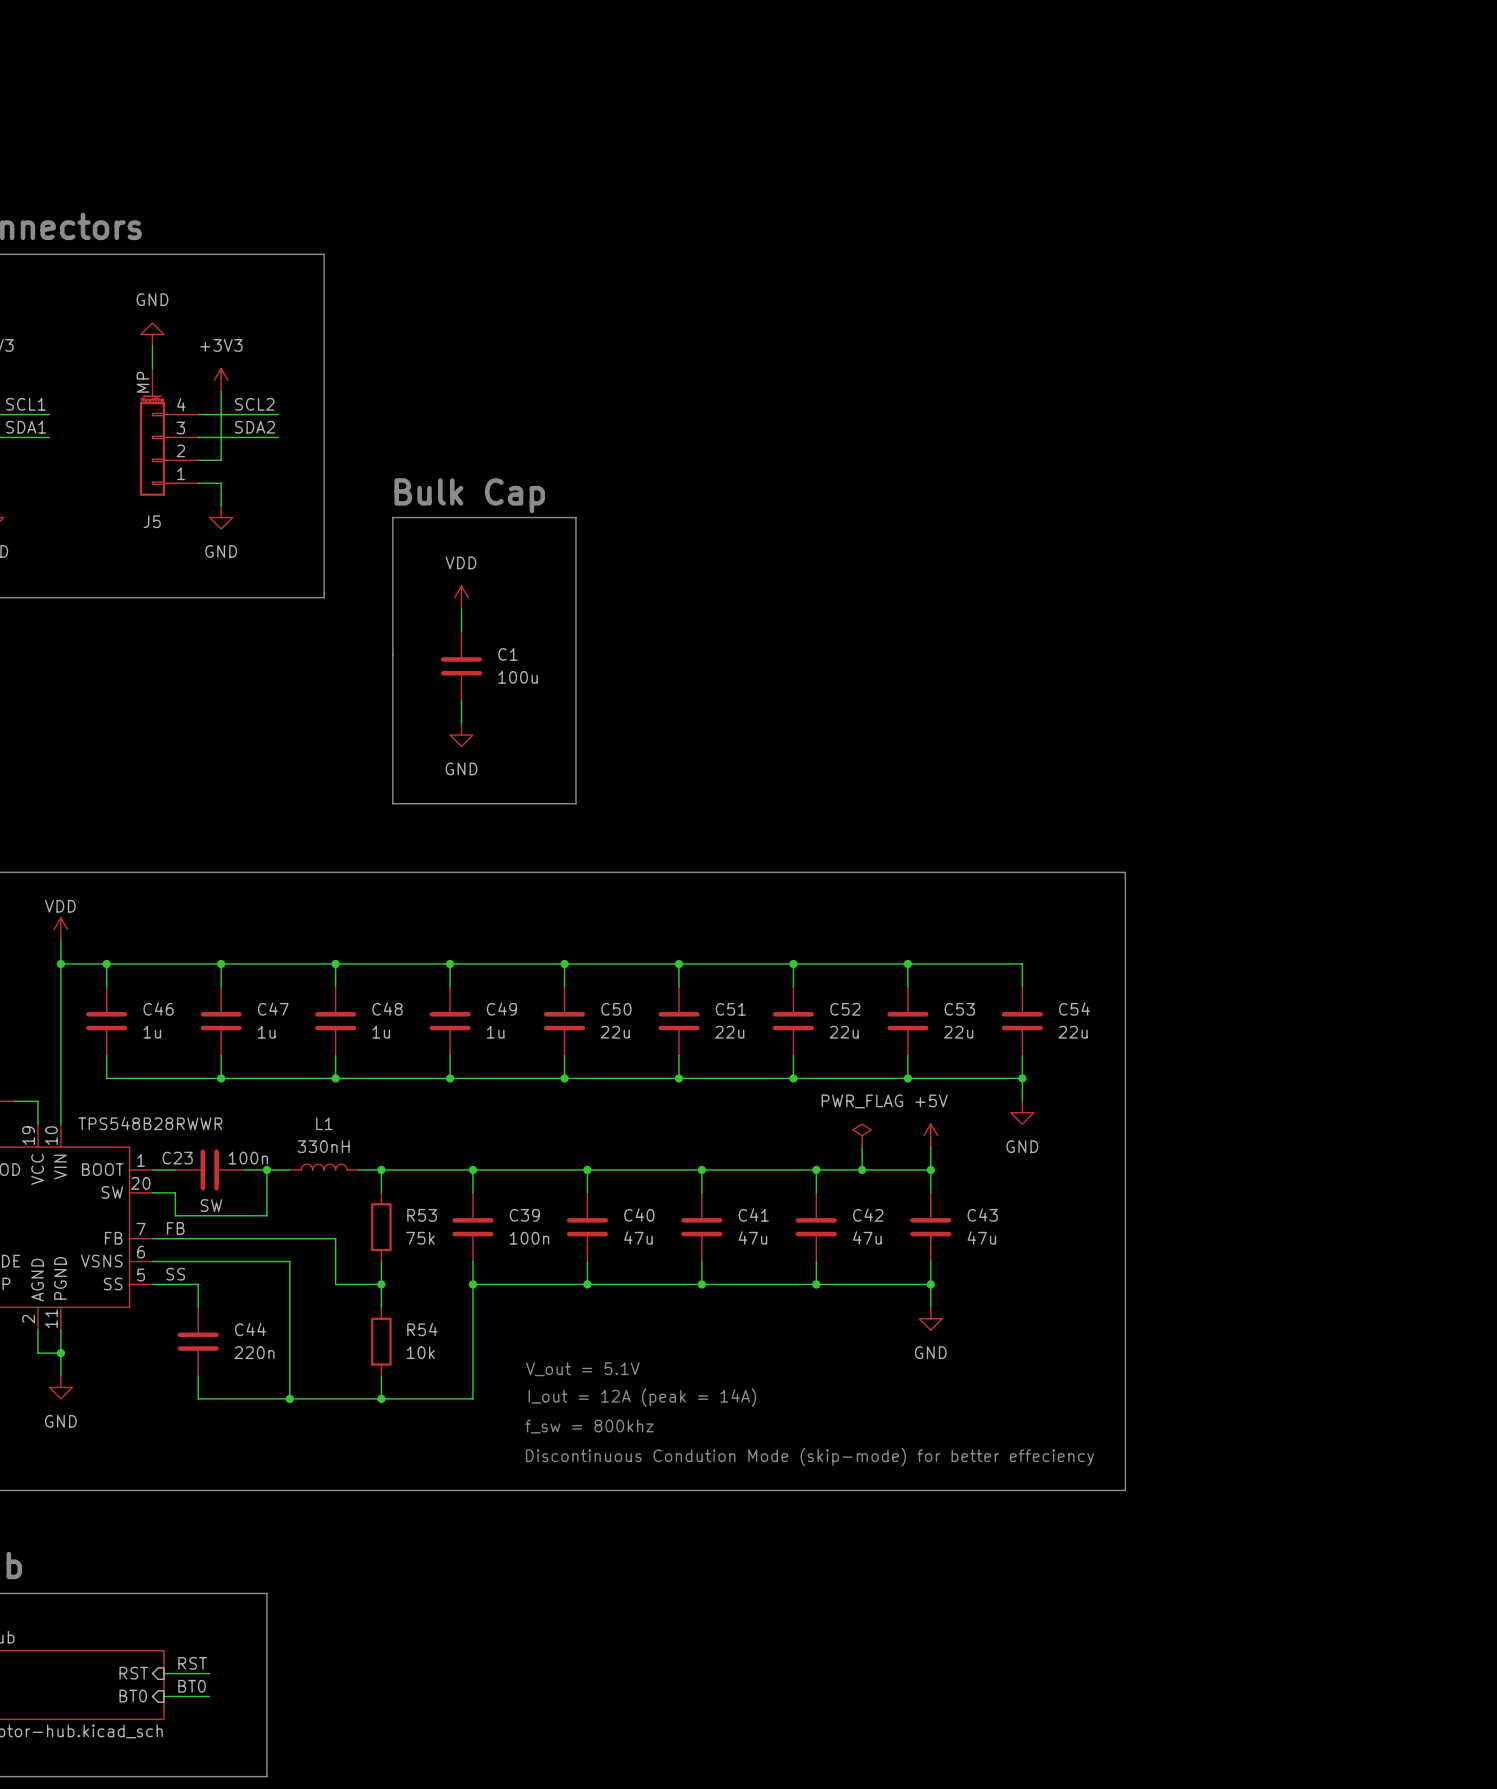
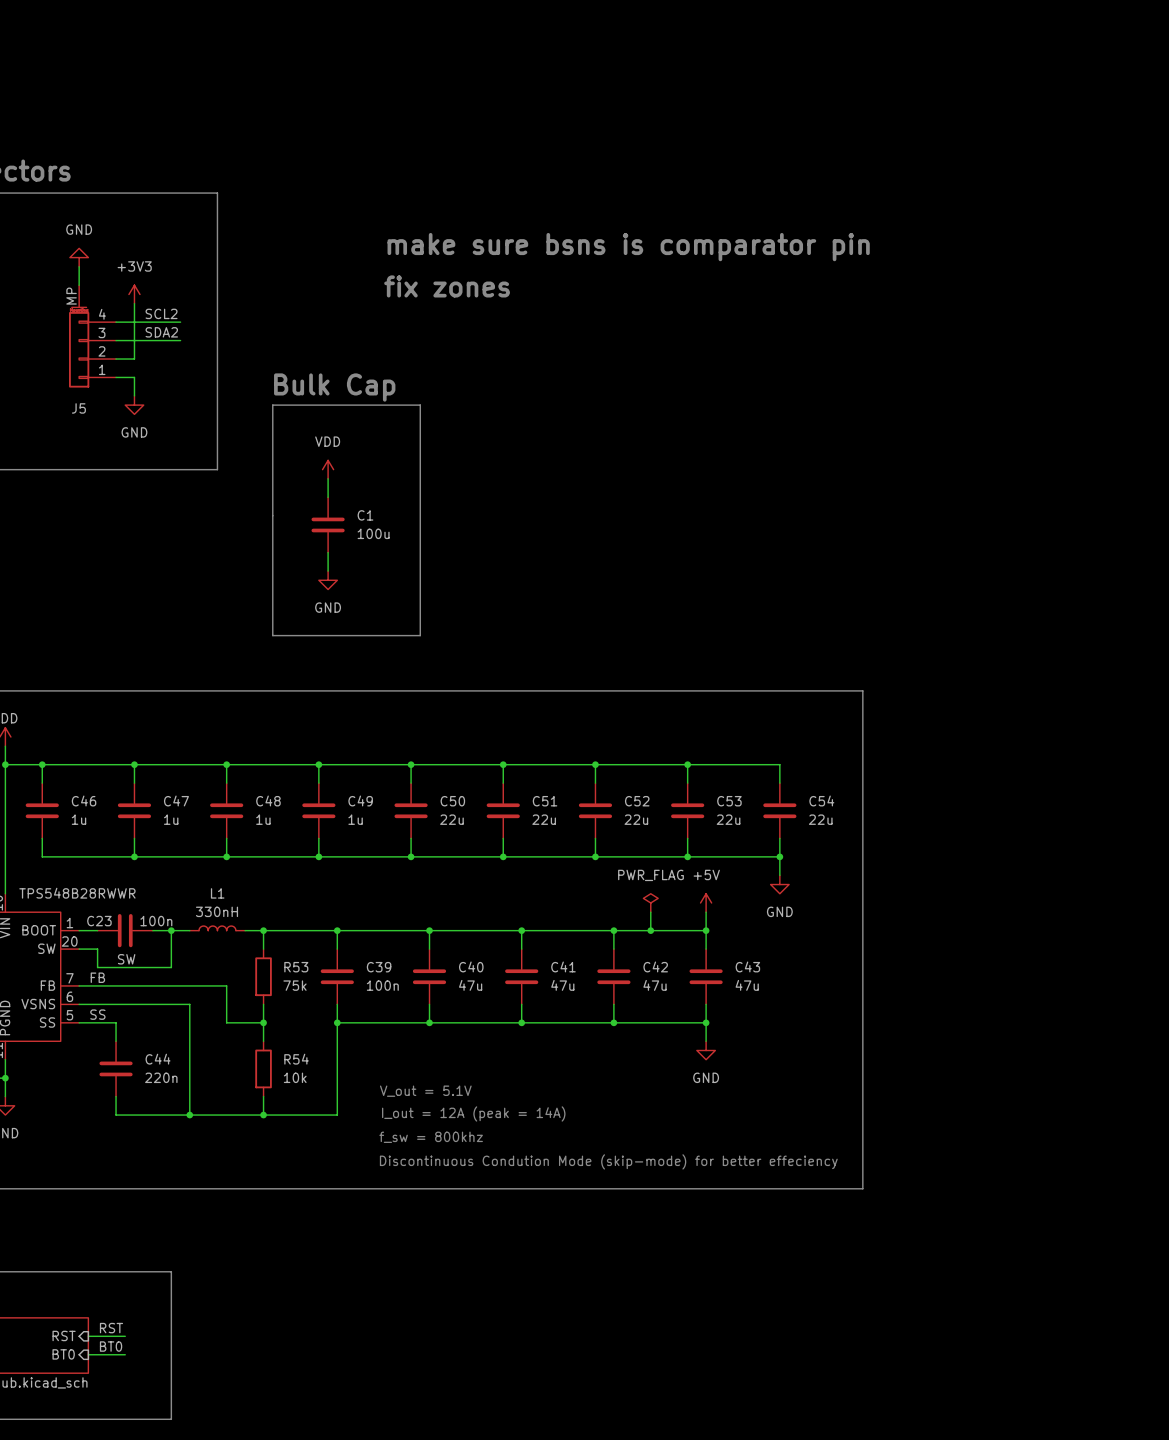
text: none -> make sure bsns is comparator pin (628, 247)
text: none -> fix zones (447, 286)

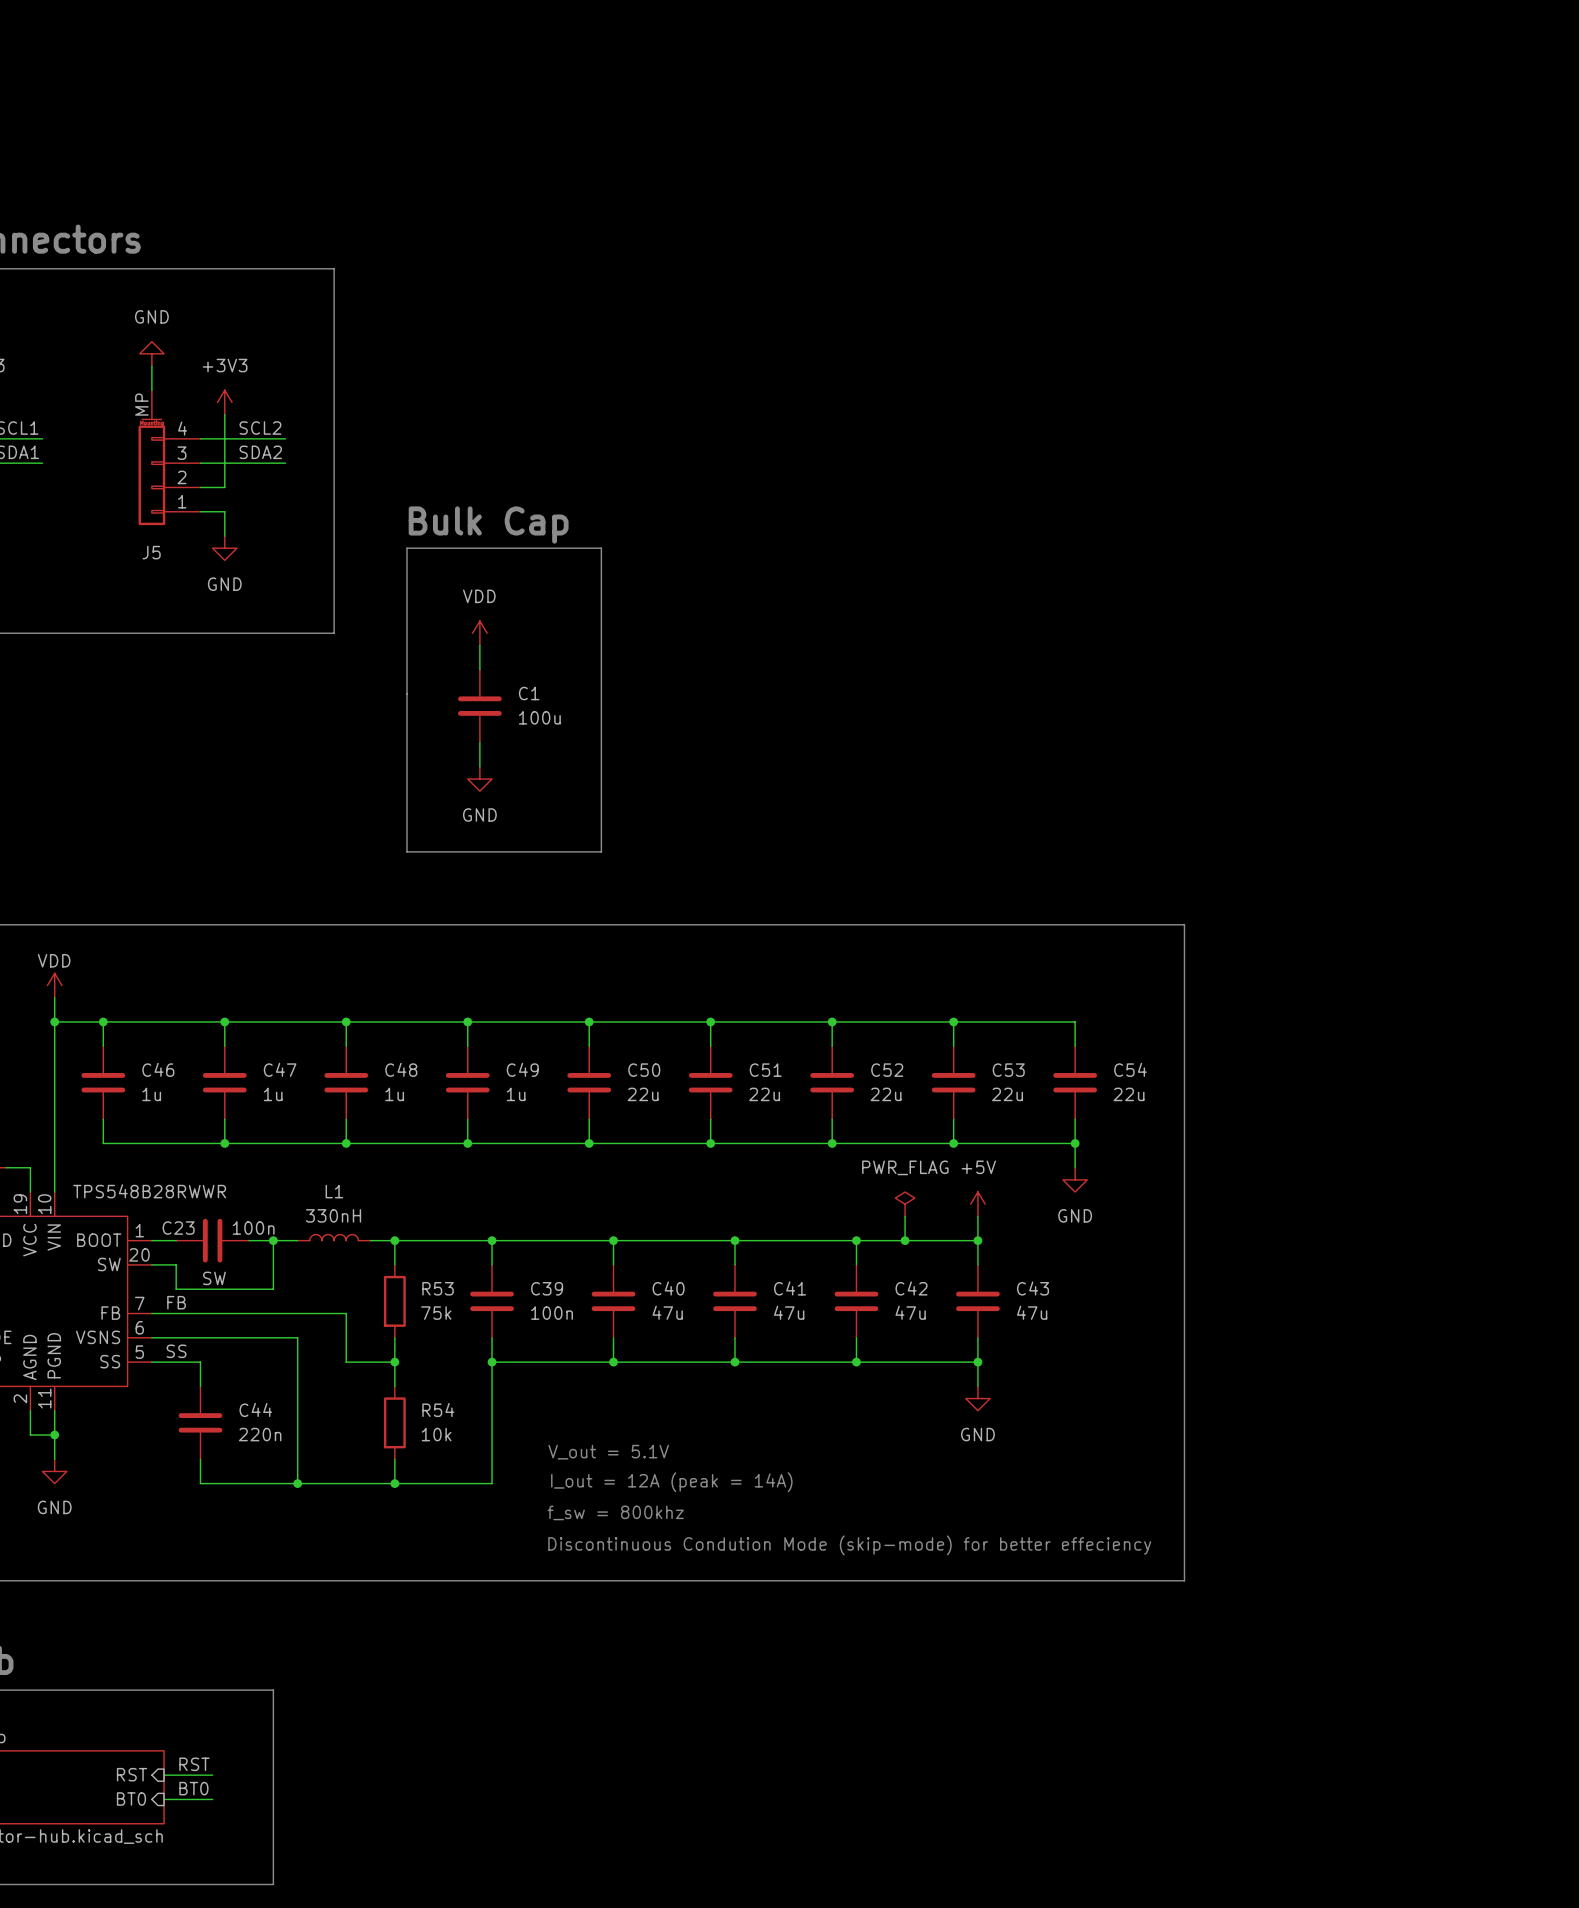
text: make sure bsns is comparator pin (628, 247) -> none
text: fix zones (447, 286) -> none

